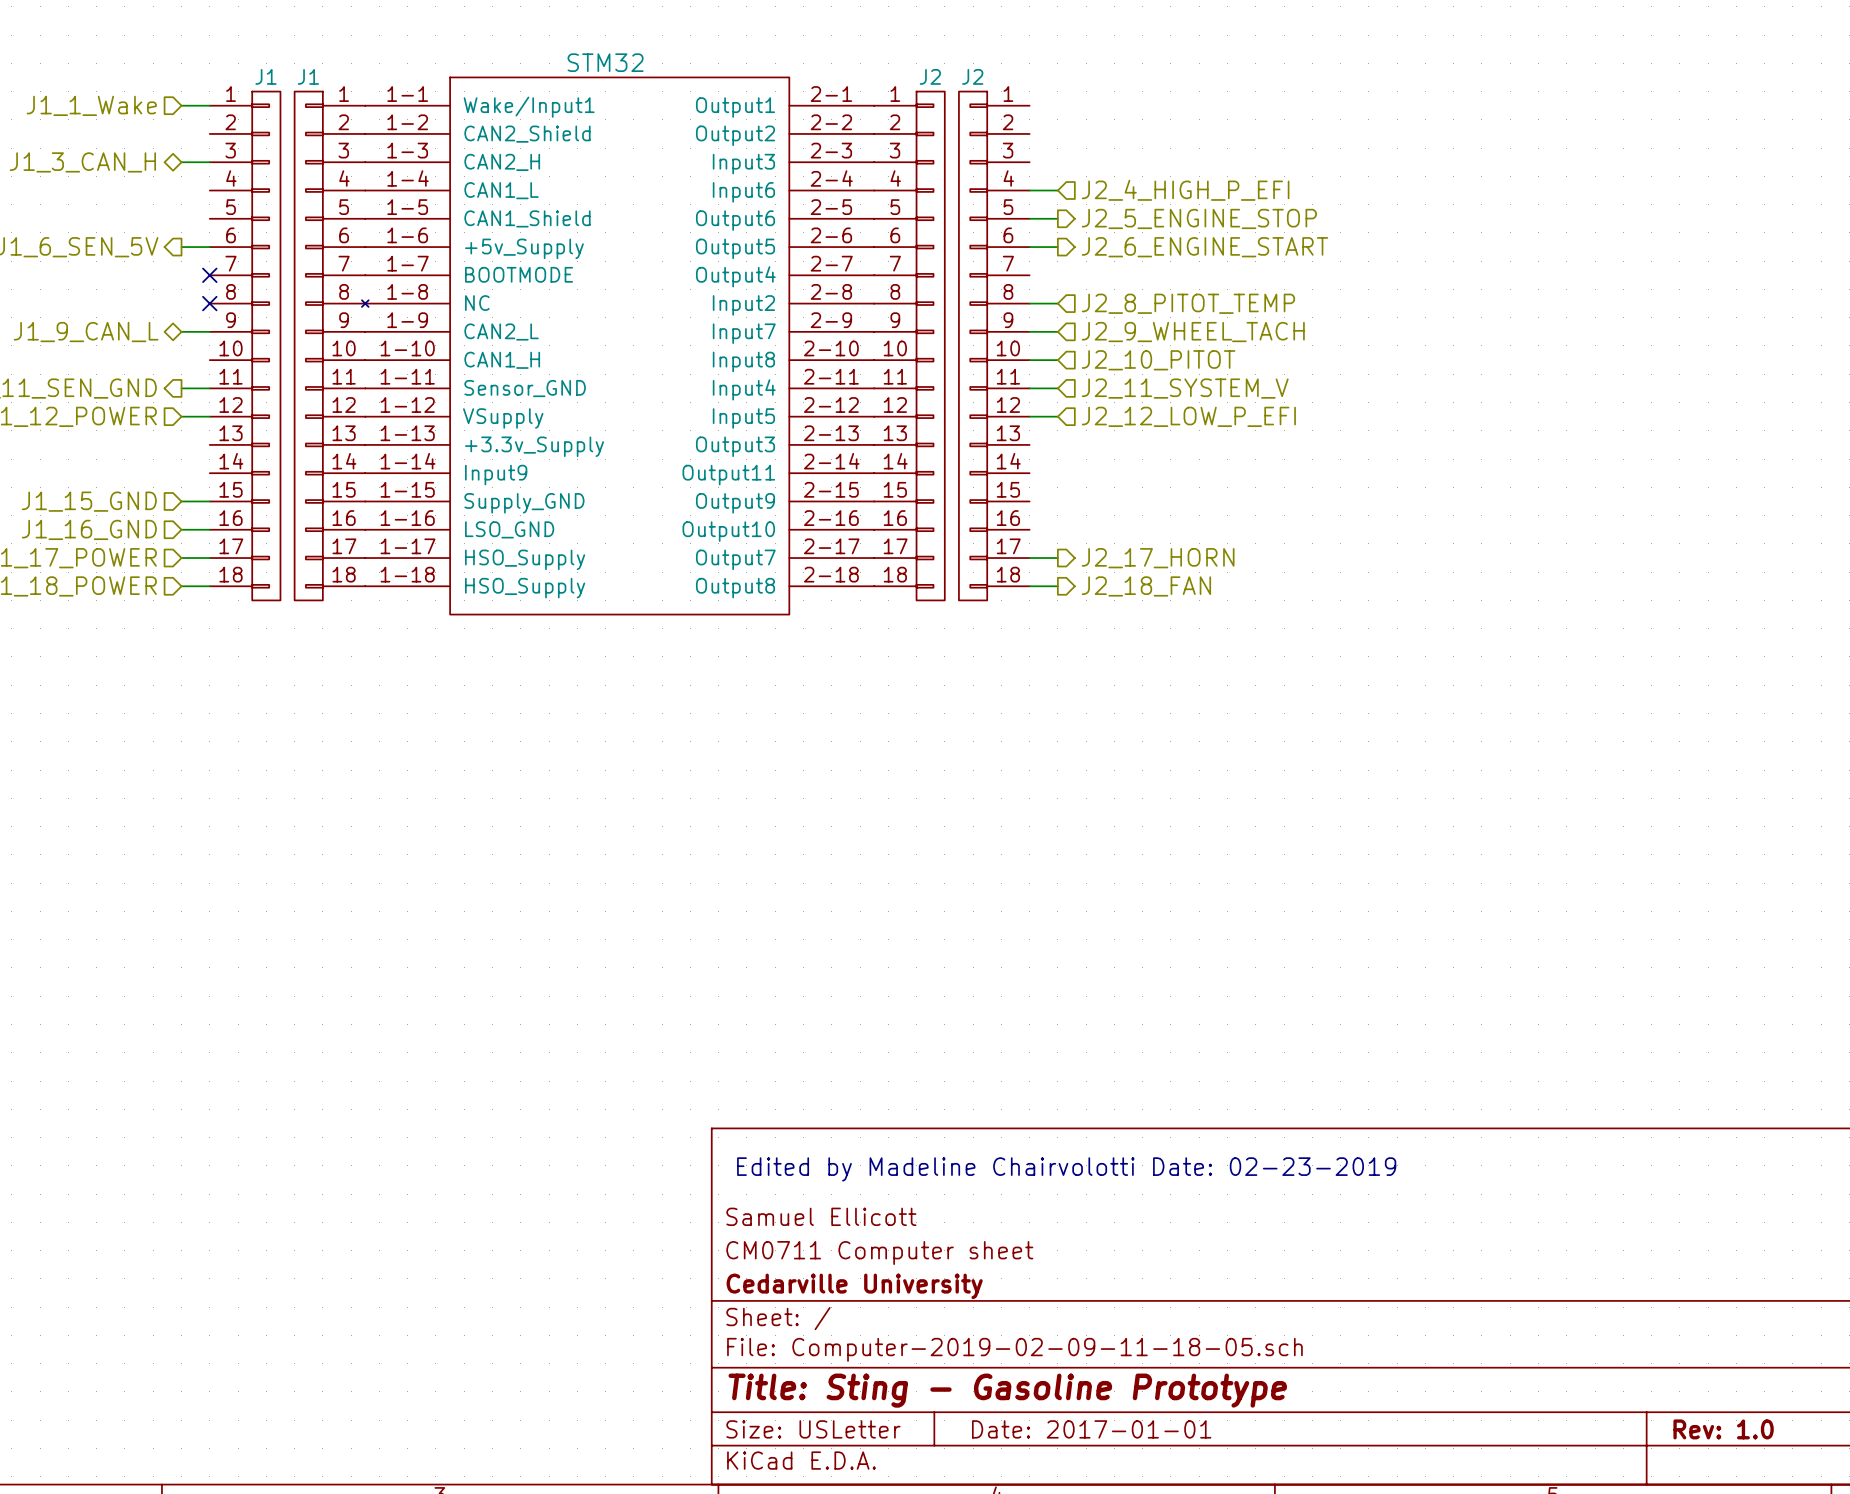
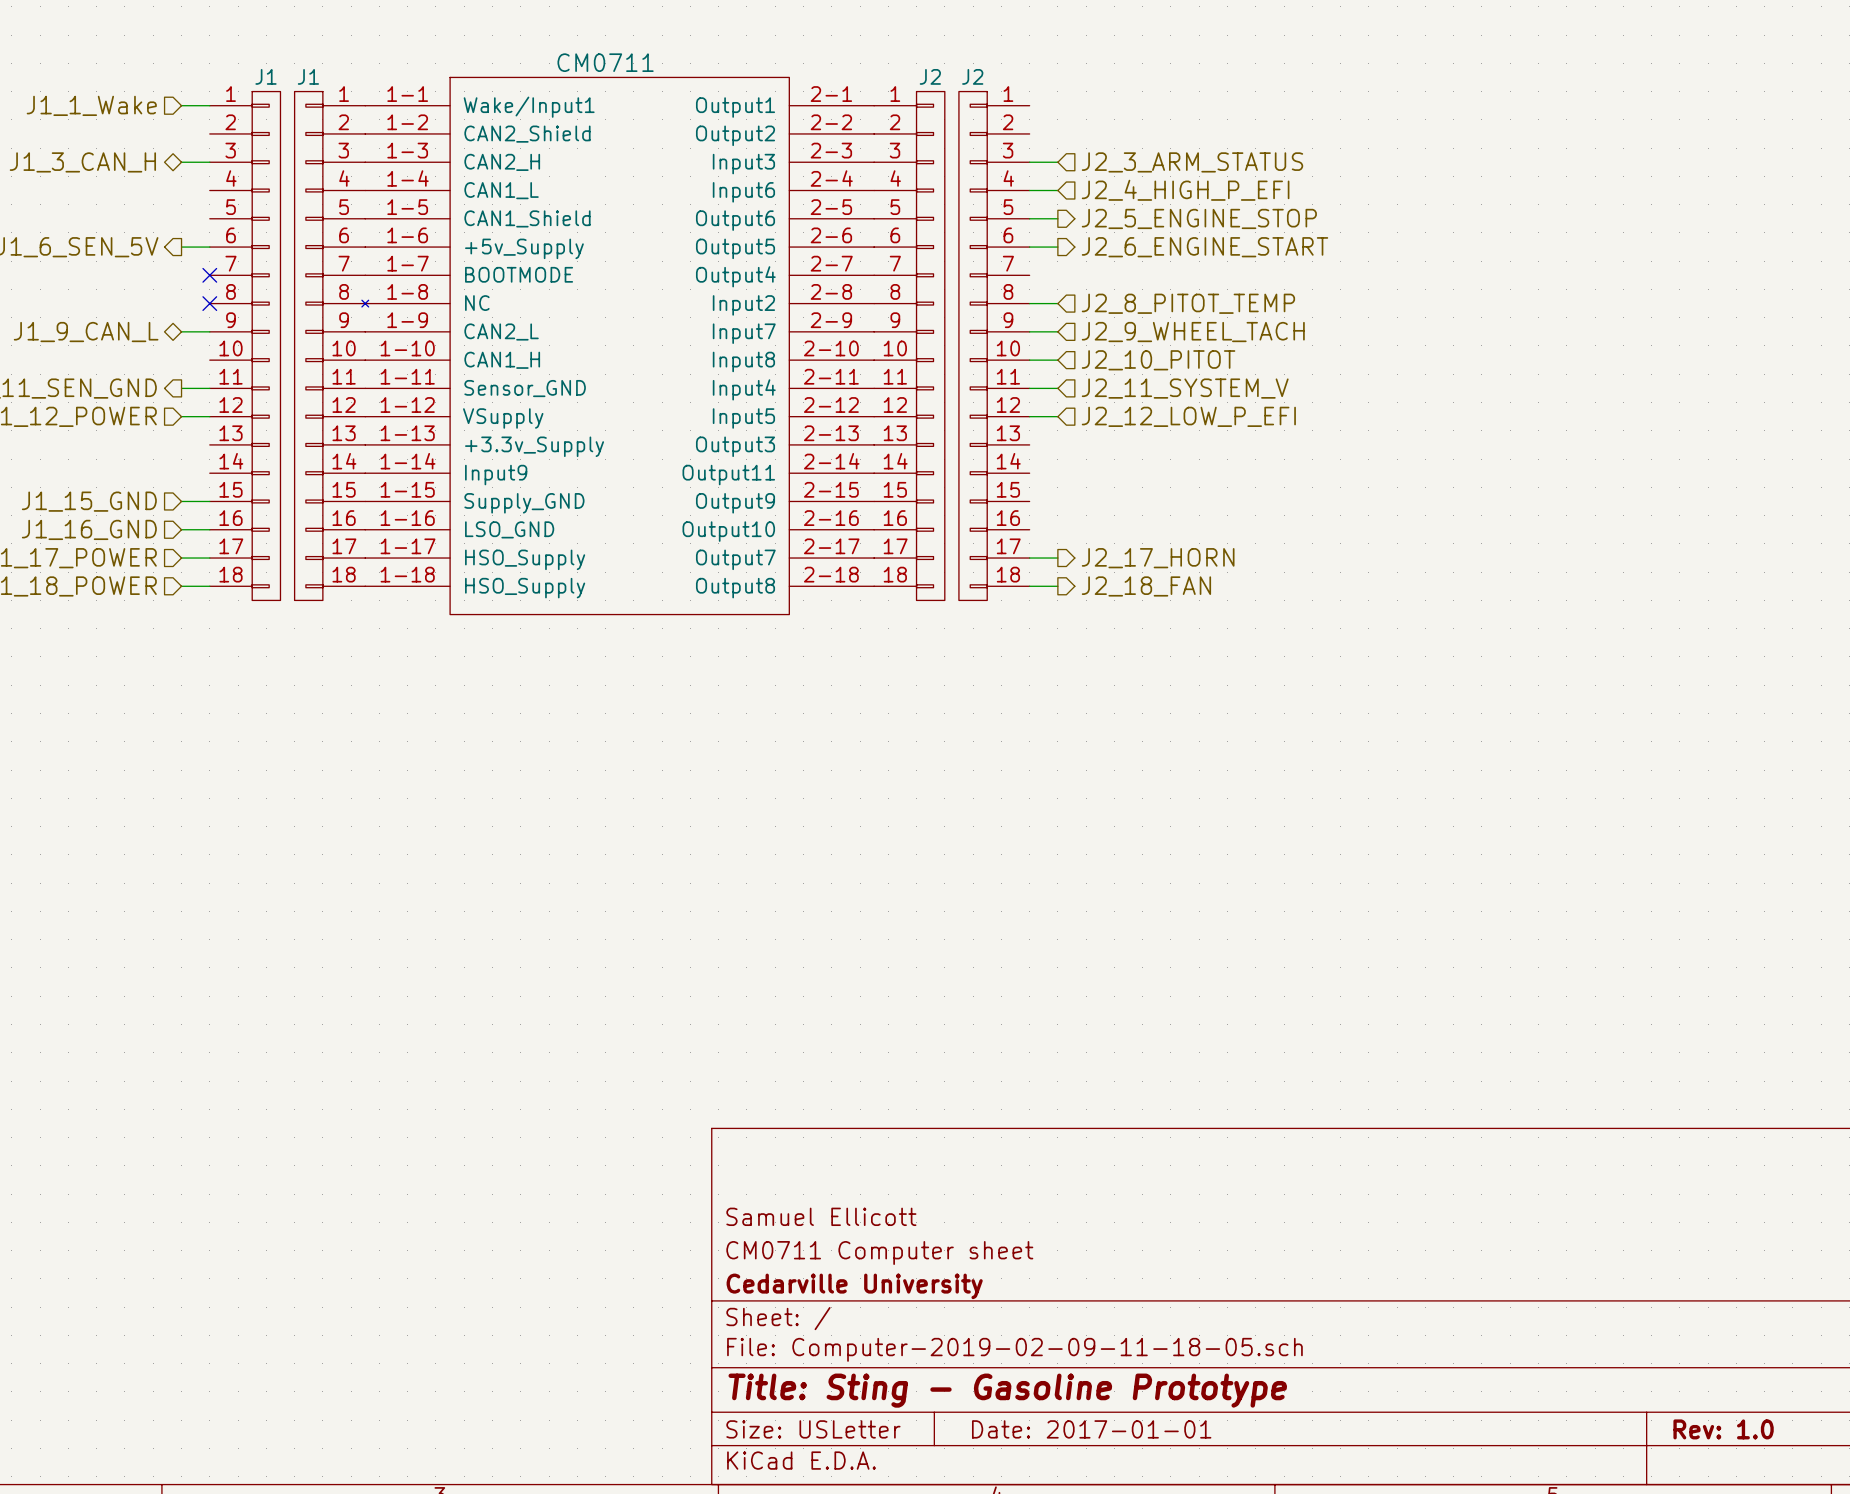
part value: STM32 (605, 62) -> CM0711 (605, 62)
wire: none -> (1029, 162) (1057, 162)
hierarchical label: none -> J2_3_ARM_STATUS (1192, 162)
text: Edited by Madeline Chairvolotti Date: 02-23-2019 (1066, 1169) -> none

